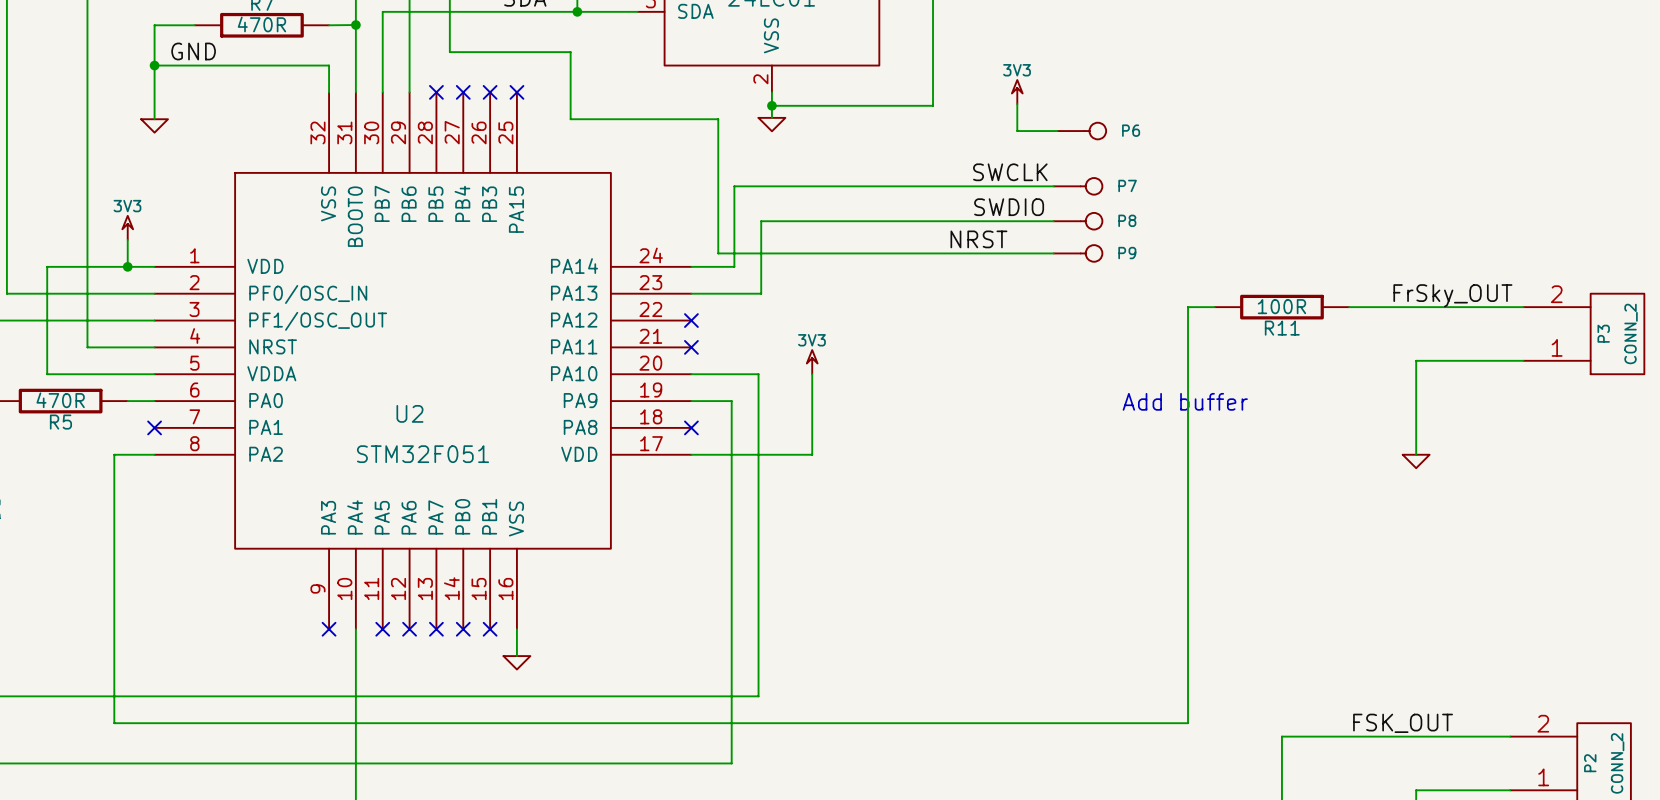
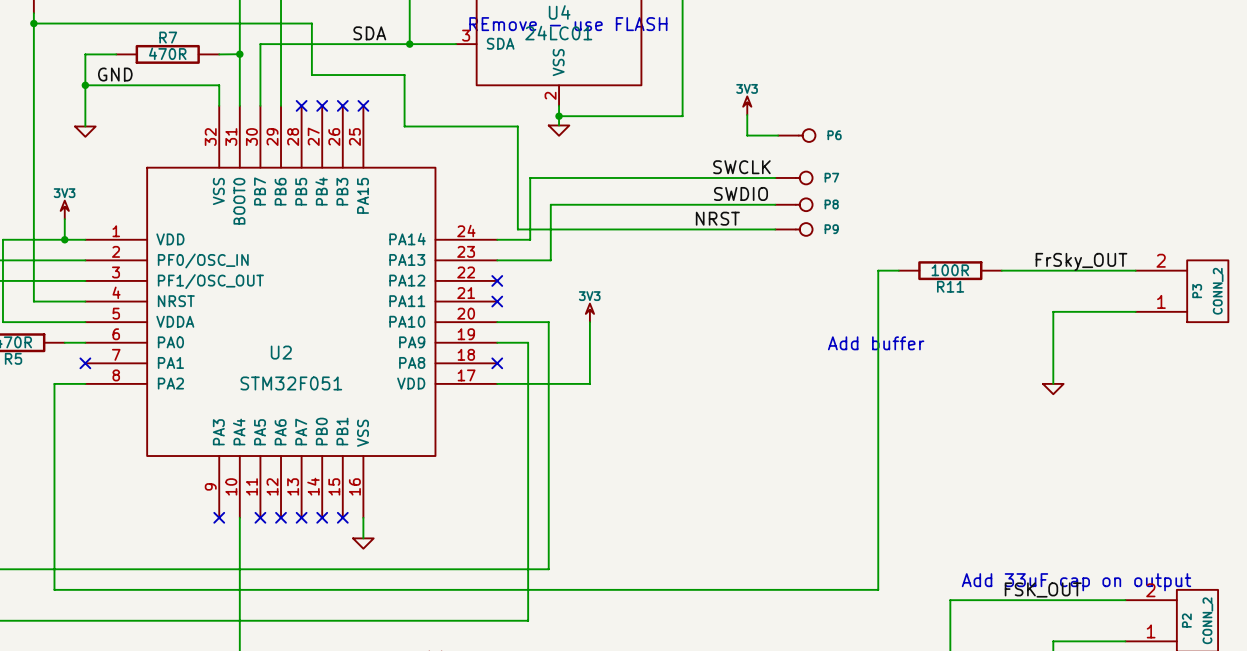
text: none -> Add 33uF cap on output (1076, 582)

